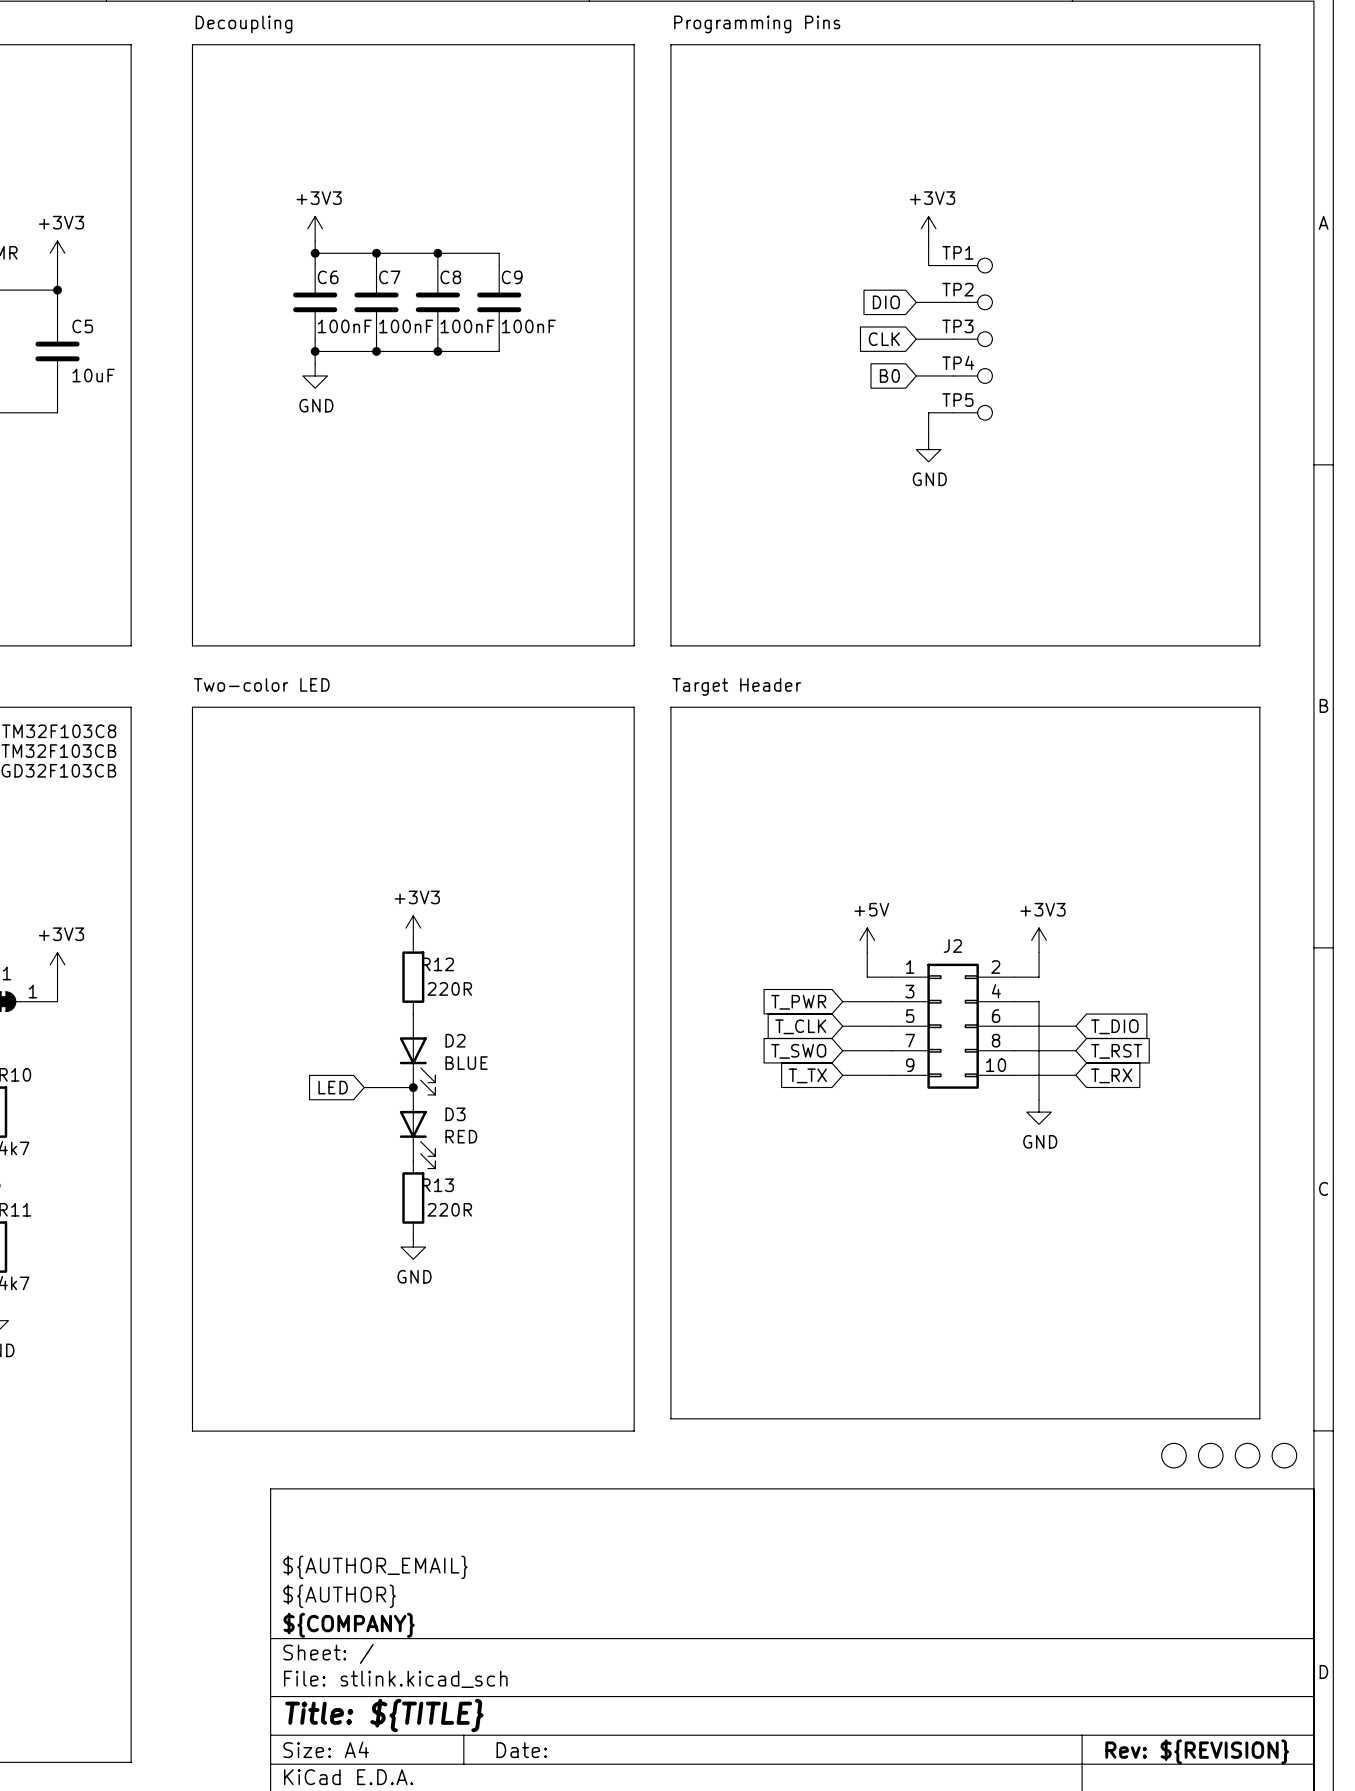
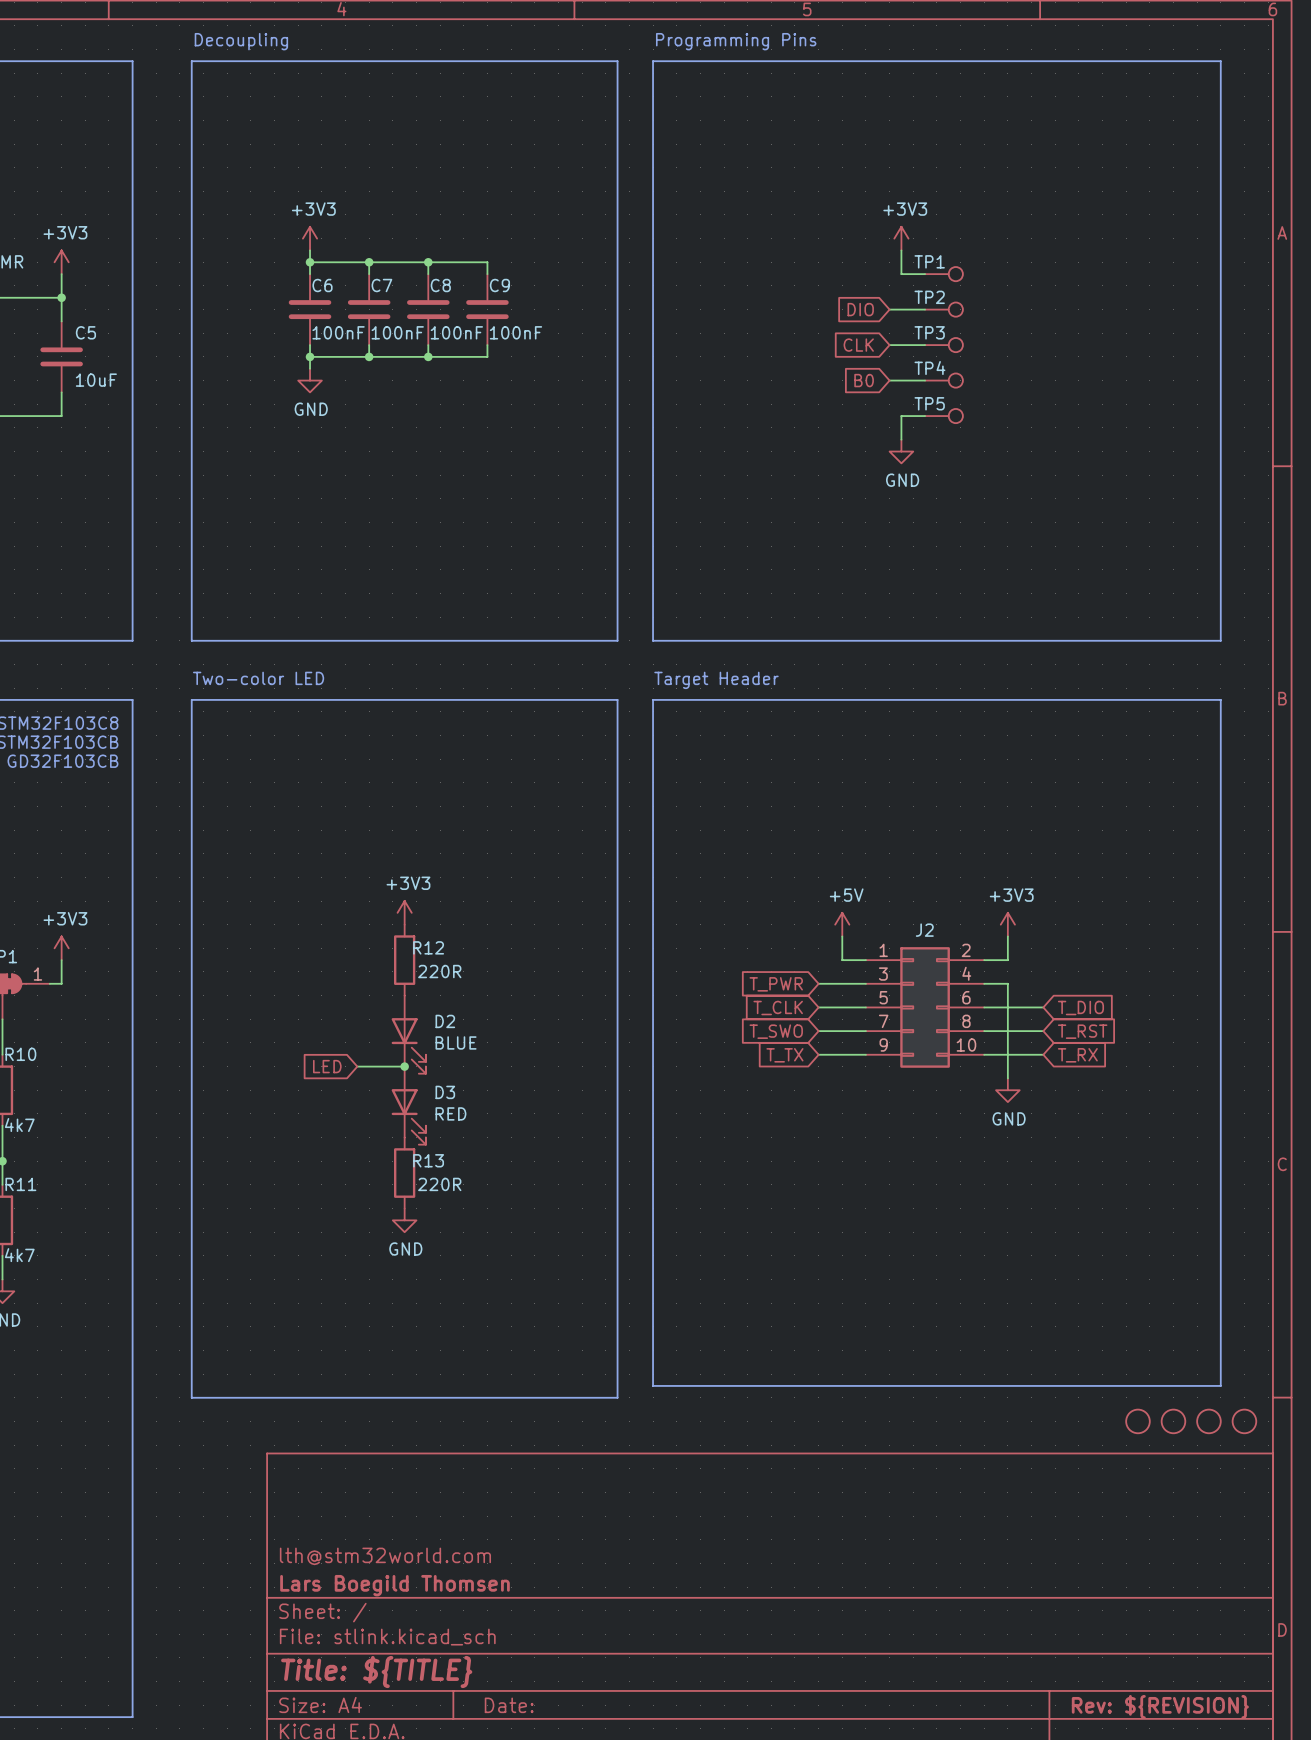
title block: ${AUTHOR_EMAIL} (375, 1567) -> none
title block: ${AUTHOR} (339, 1596) -> lth@stm32world.com (385, 1556)
title block: ${COMPANY} (349, 1625) -> Lars Boegild Thomsen (394, 1585)

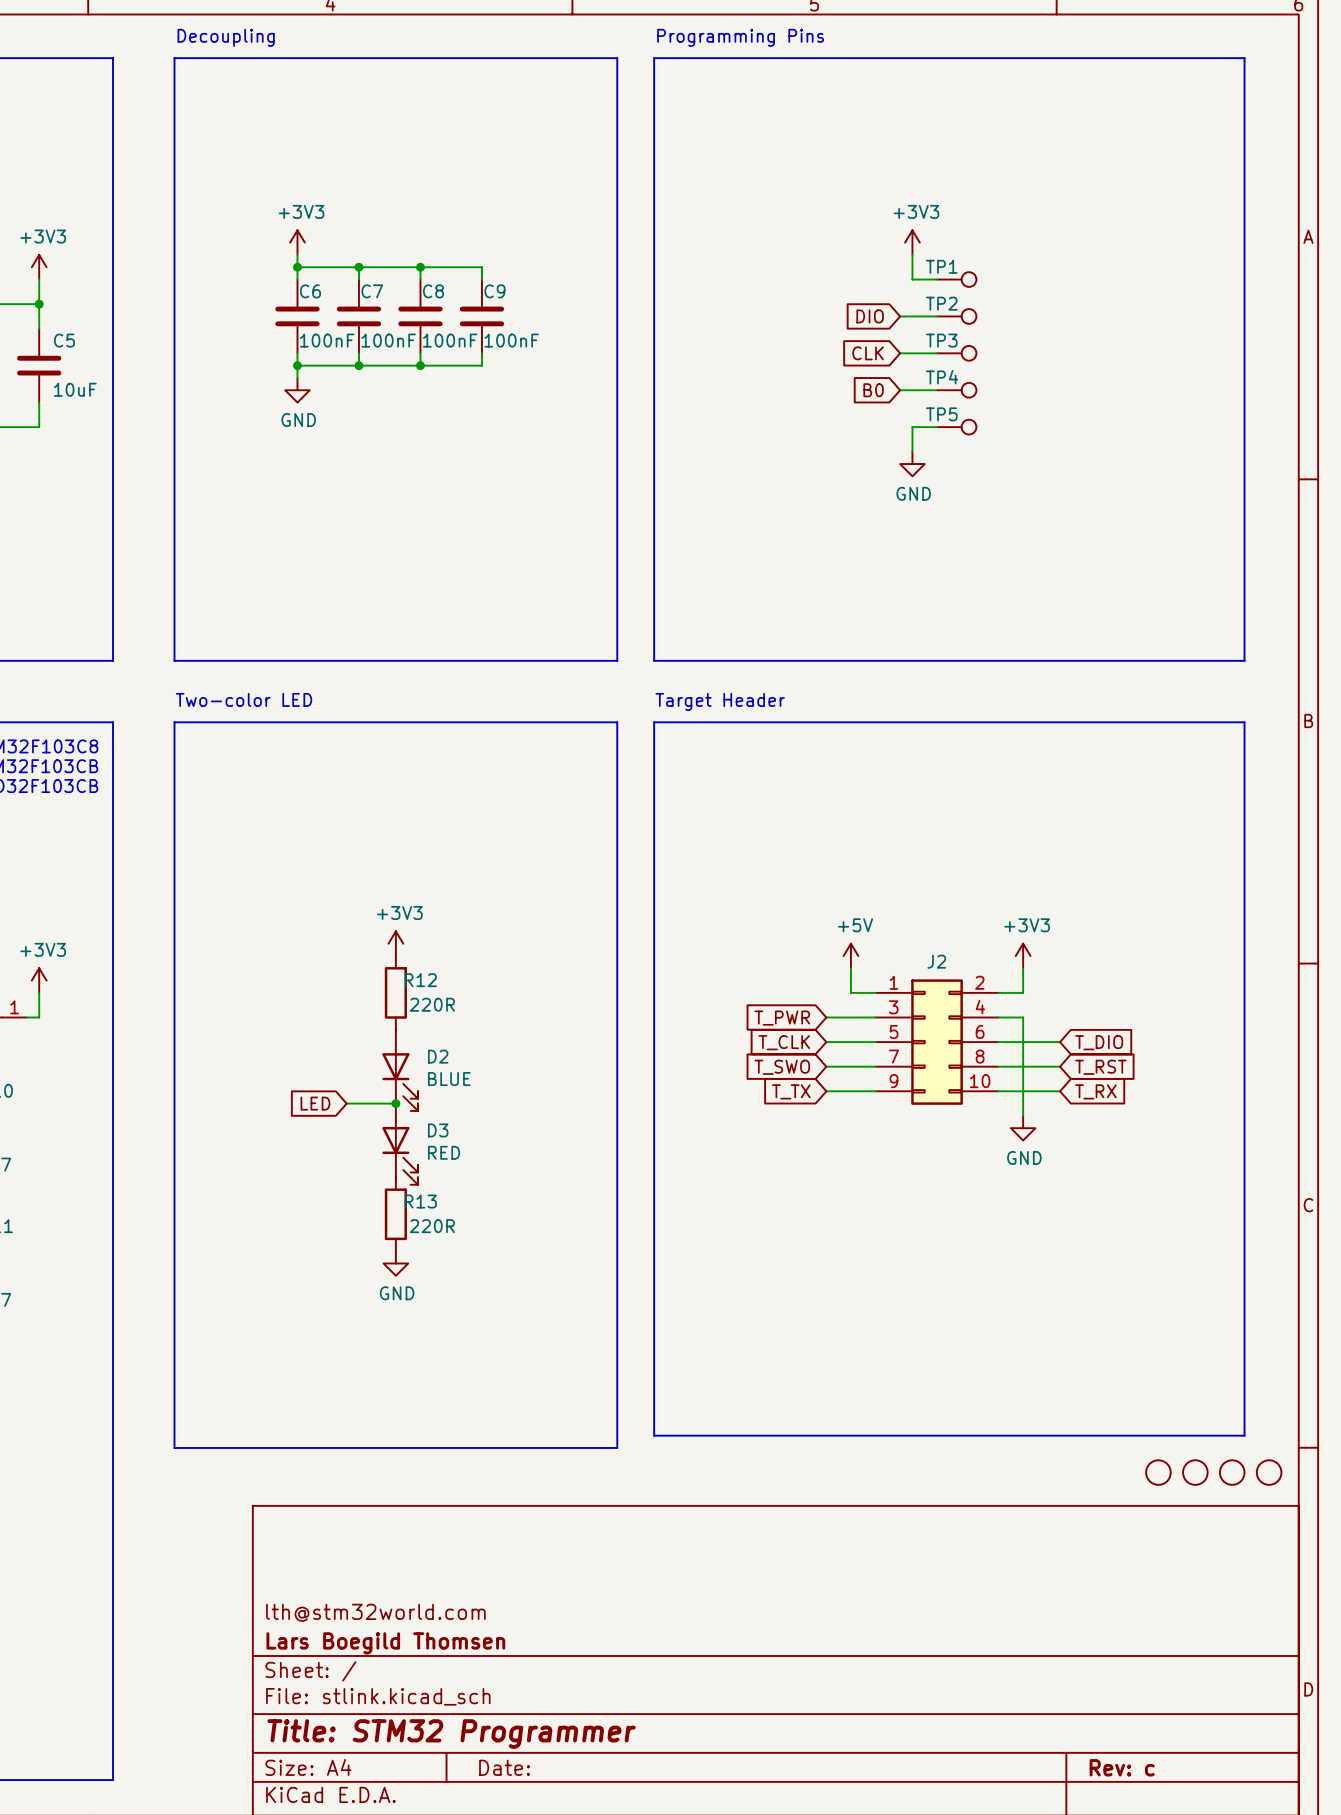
title block: Title: ${TITLE} (376, 1671) -> Title: STM32 Programmer (451, 1734)
title block: Rev: ${REVISION} (1160, 1707) -> Rev: c (1122, 1767)

